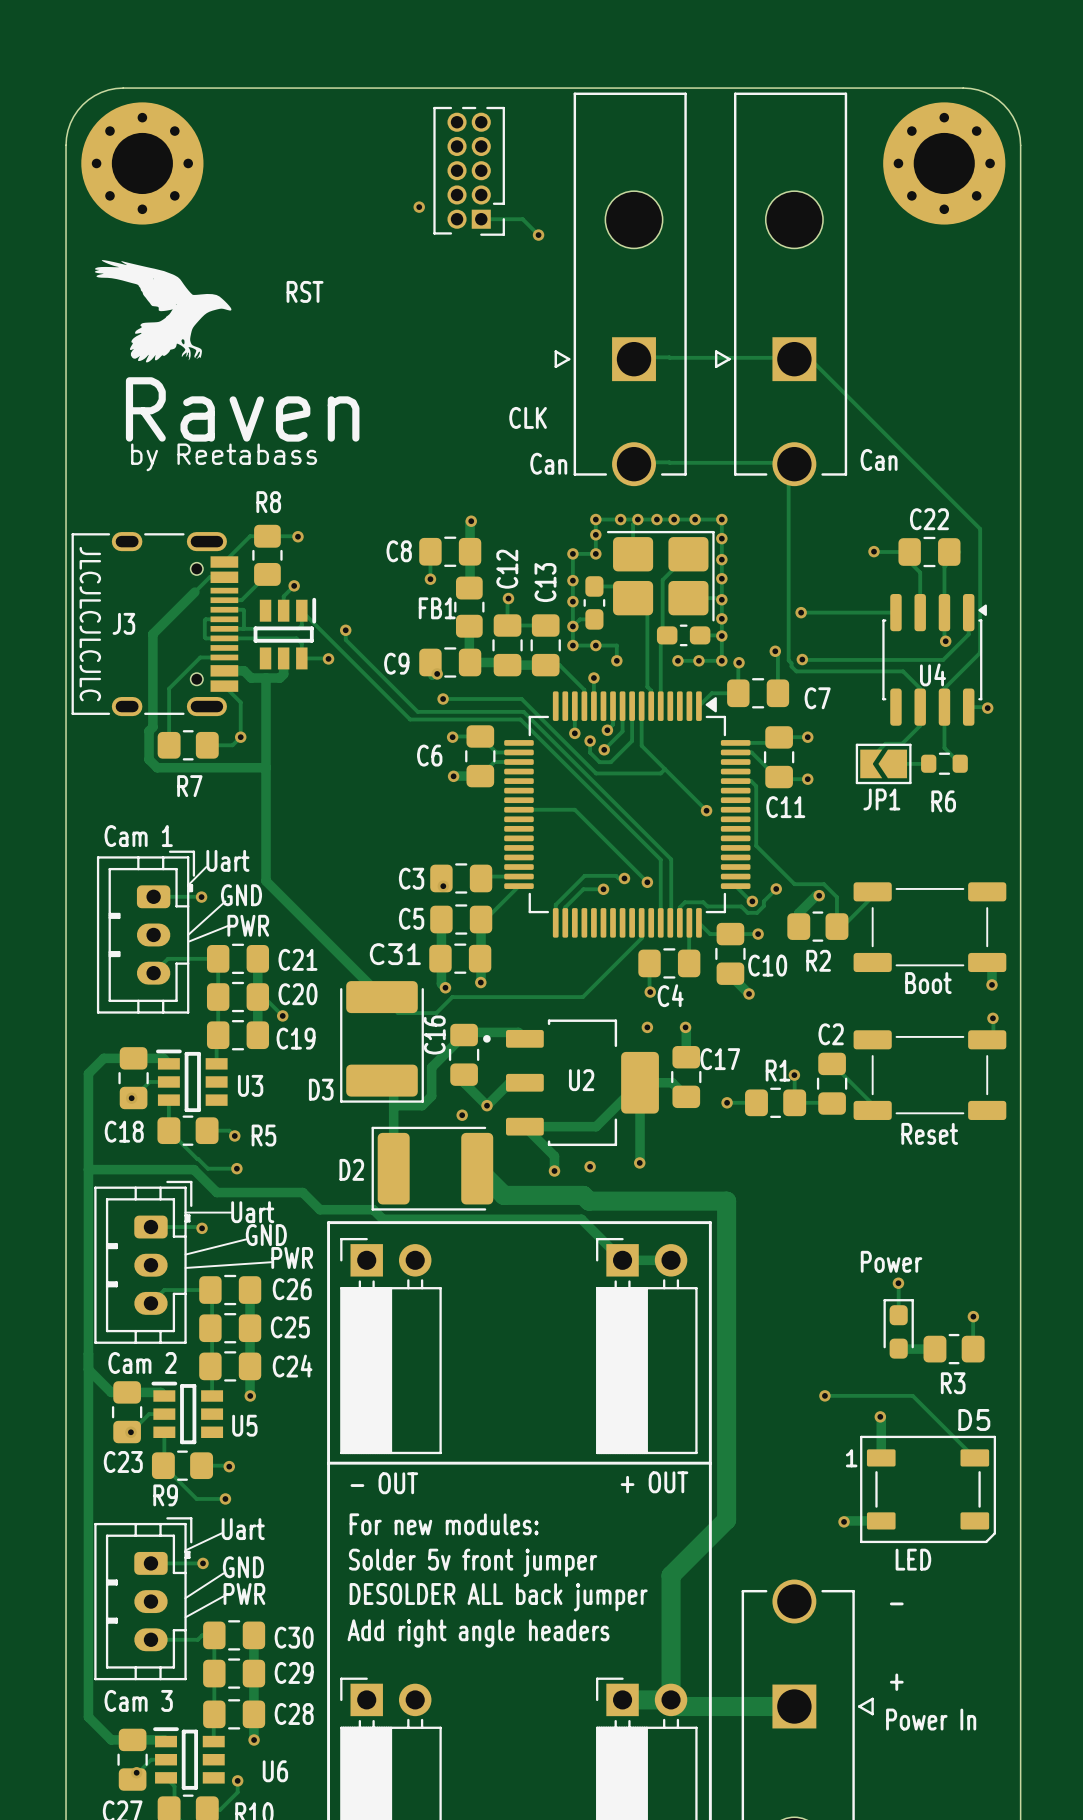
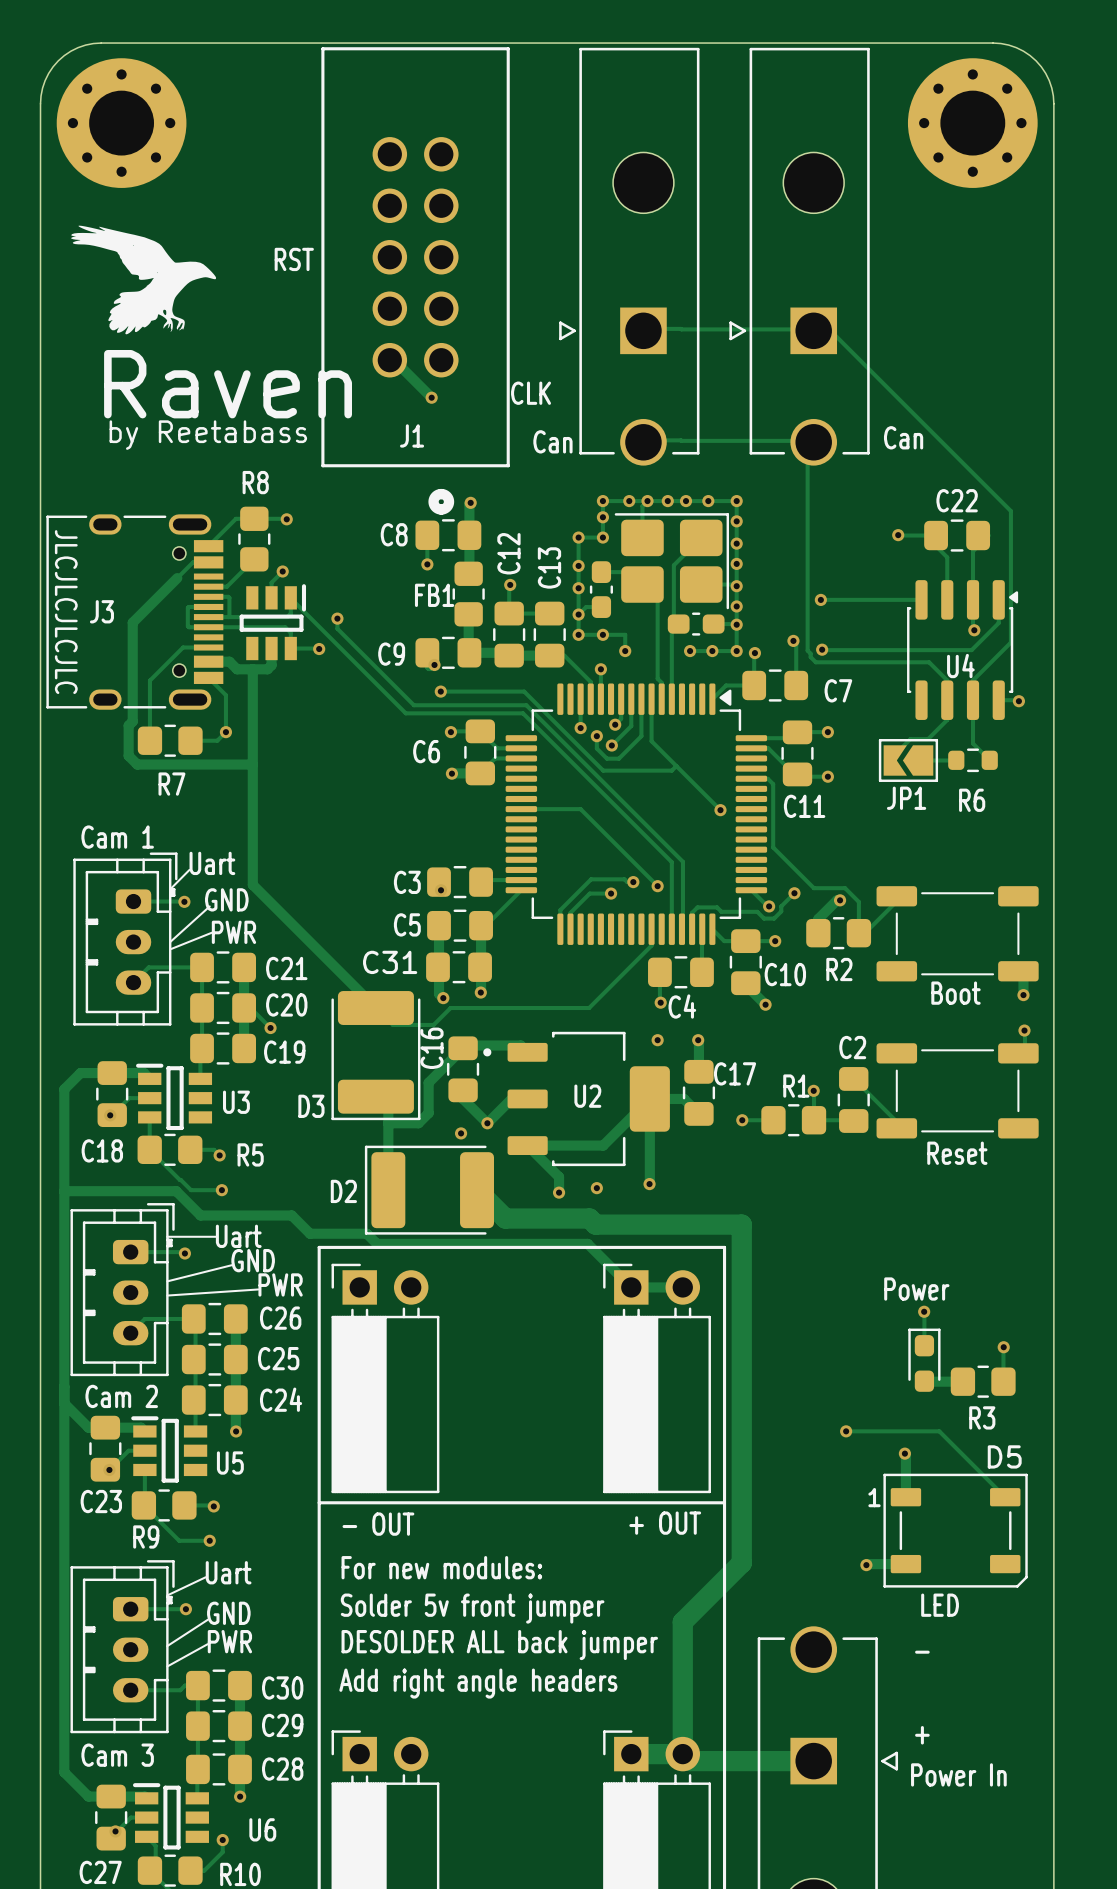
part: (469, 171) -> none
via: (419, 207) -> none
track: (481, 219) (522, 219) (538, 235) -> none
via: (538, 235) -> none
J1: none -> (415, 280)
track: none -> (391, 357) (431, 397)
via: none -> (431, 397)

